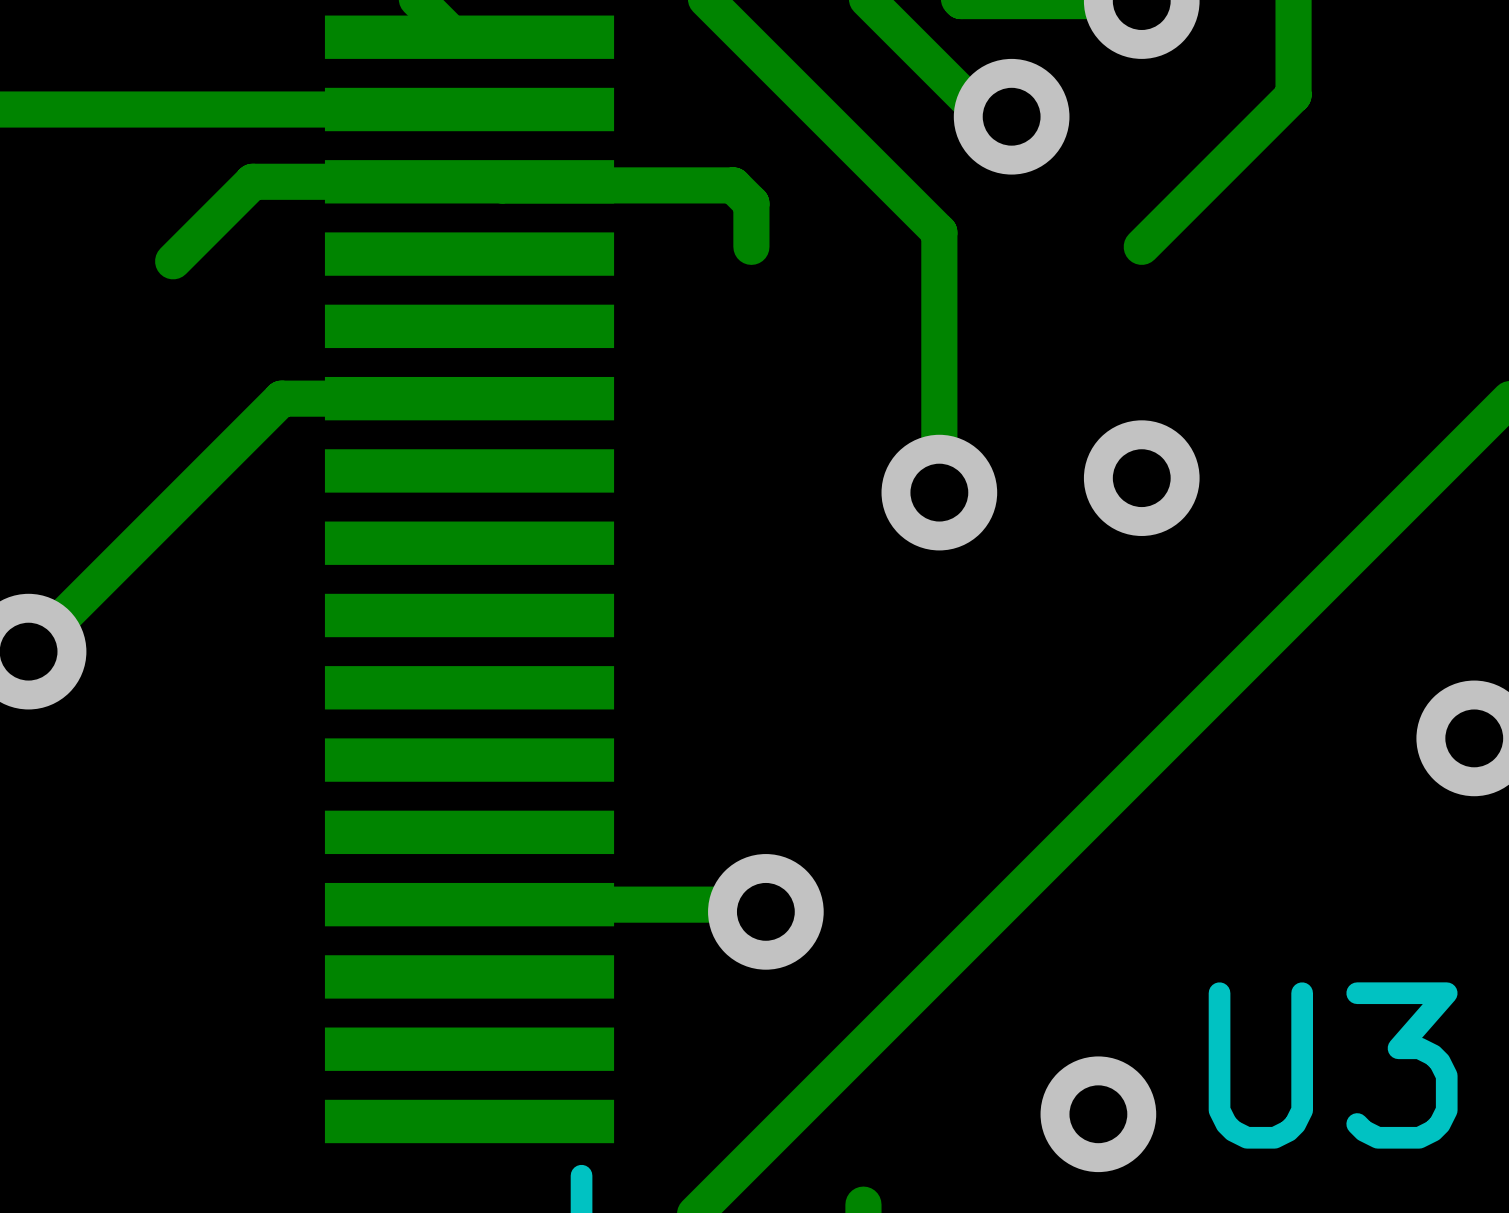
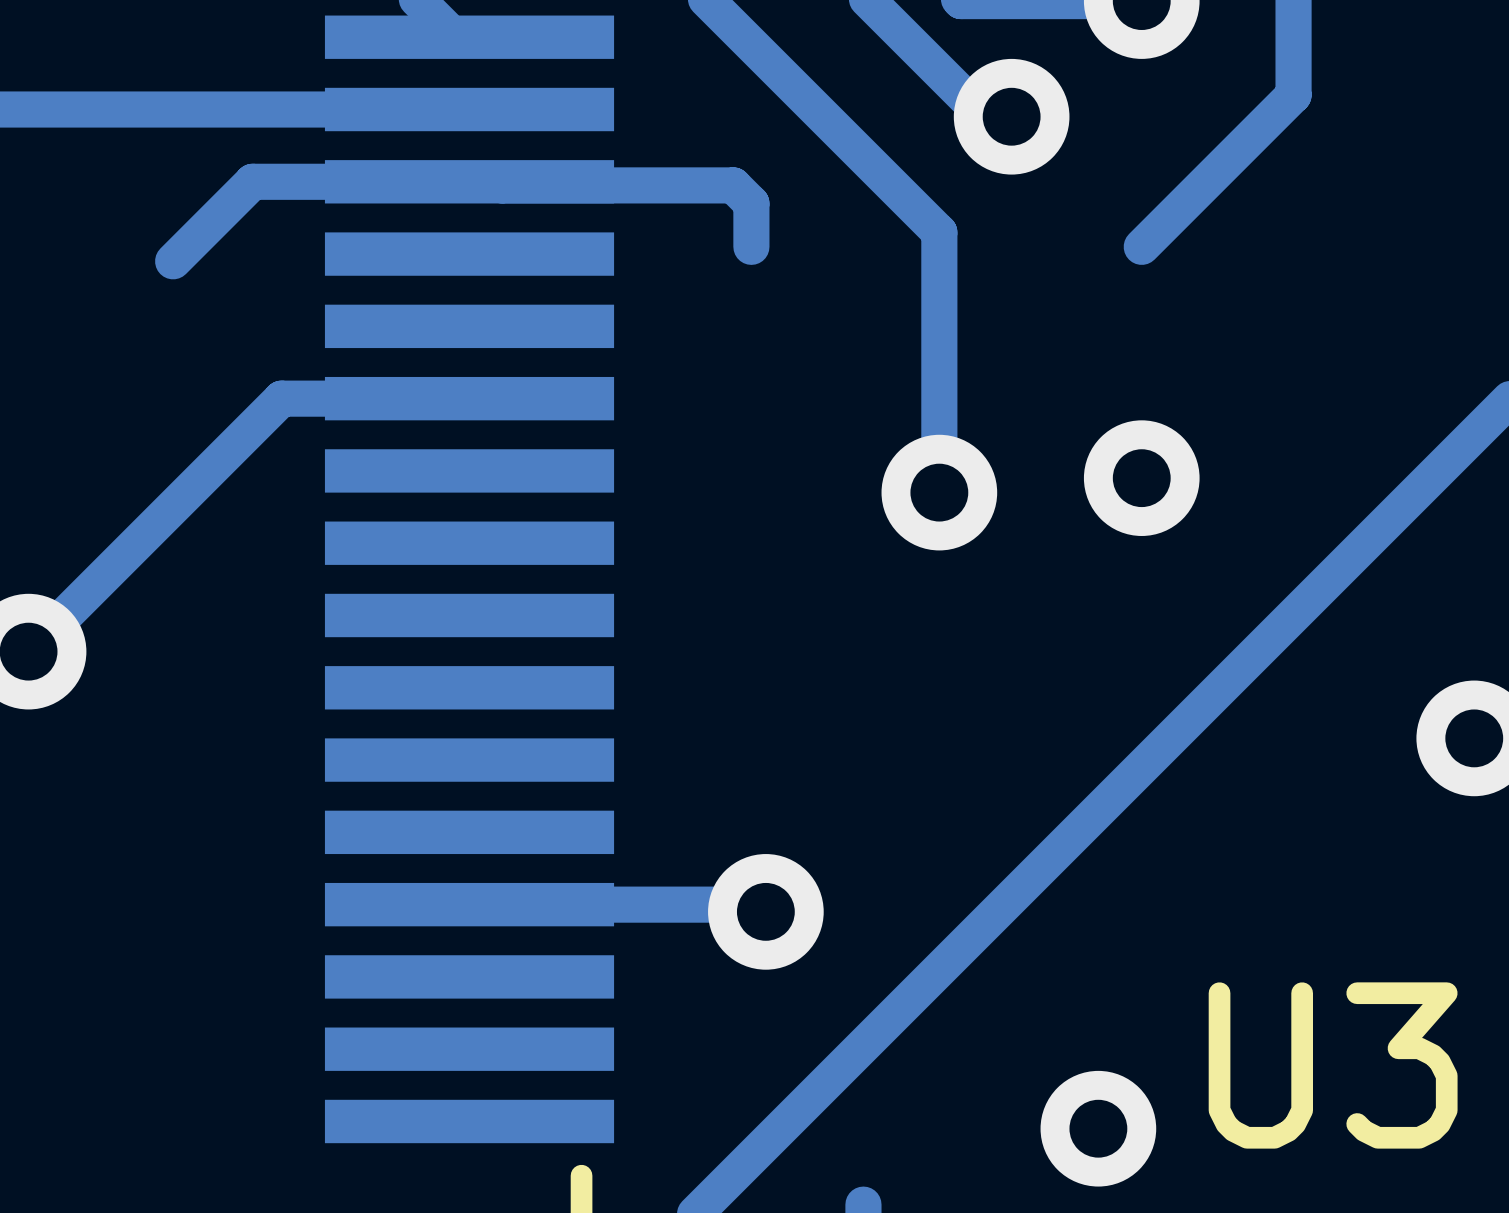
via position: (1098, 1114) -> (1098, 1128)

